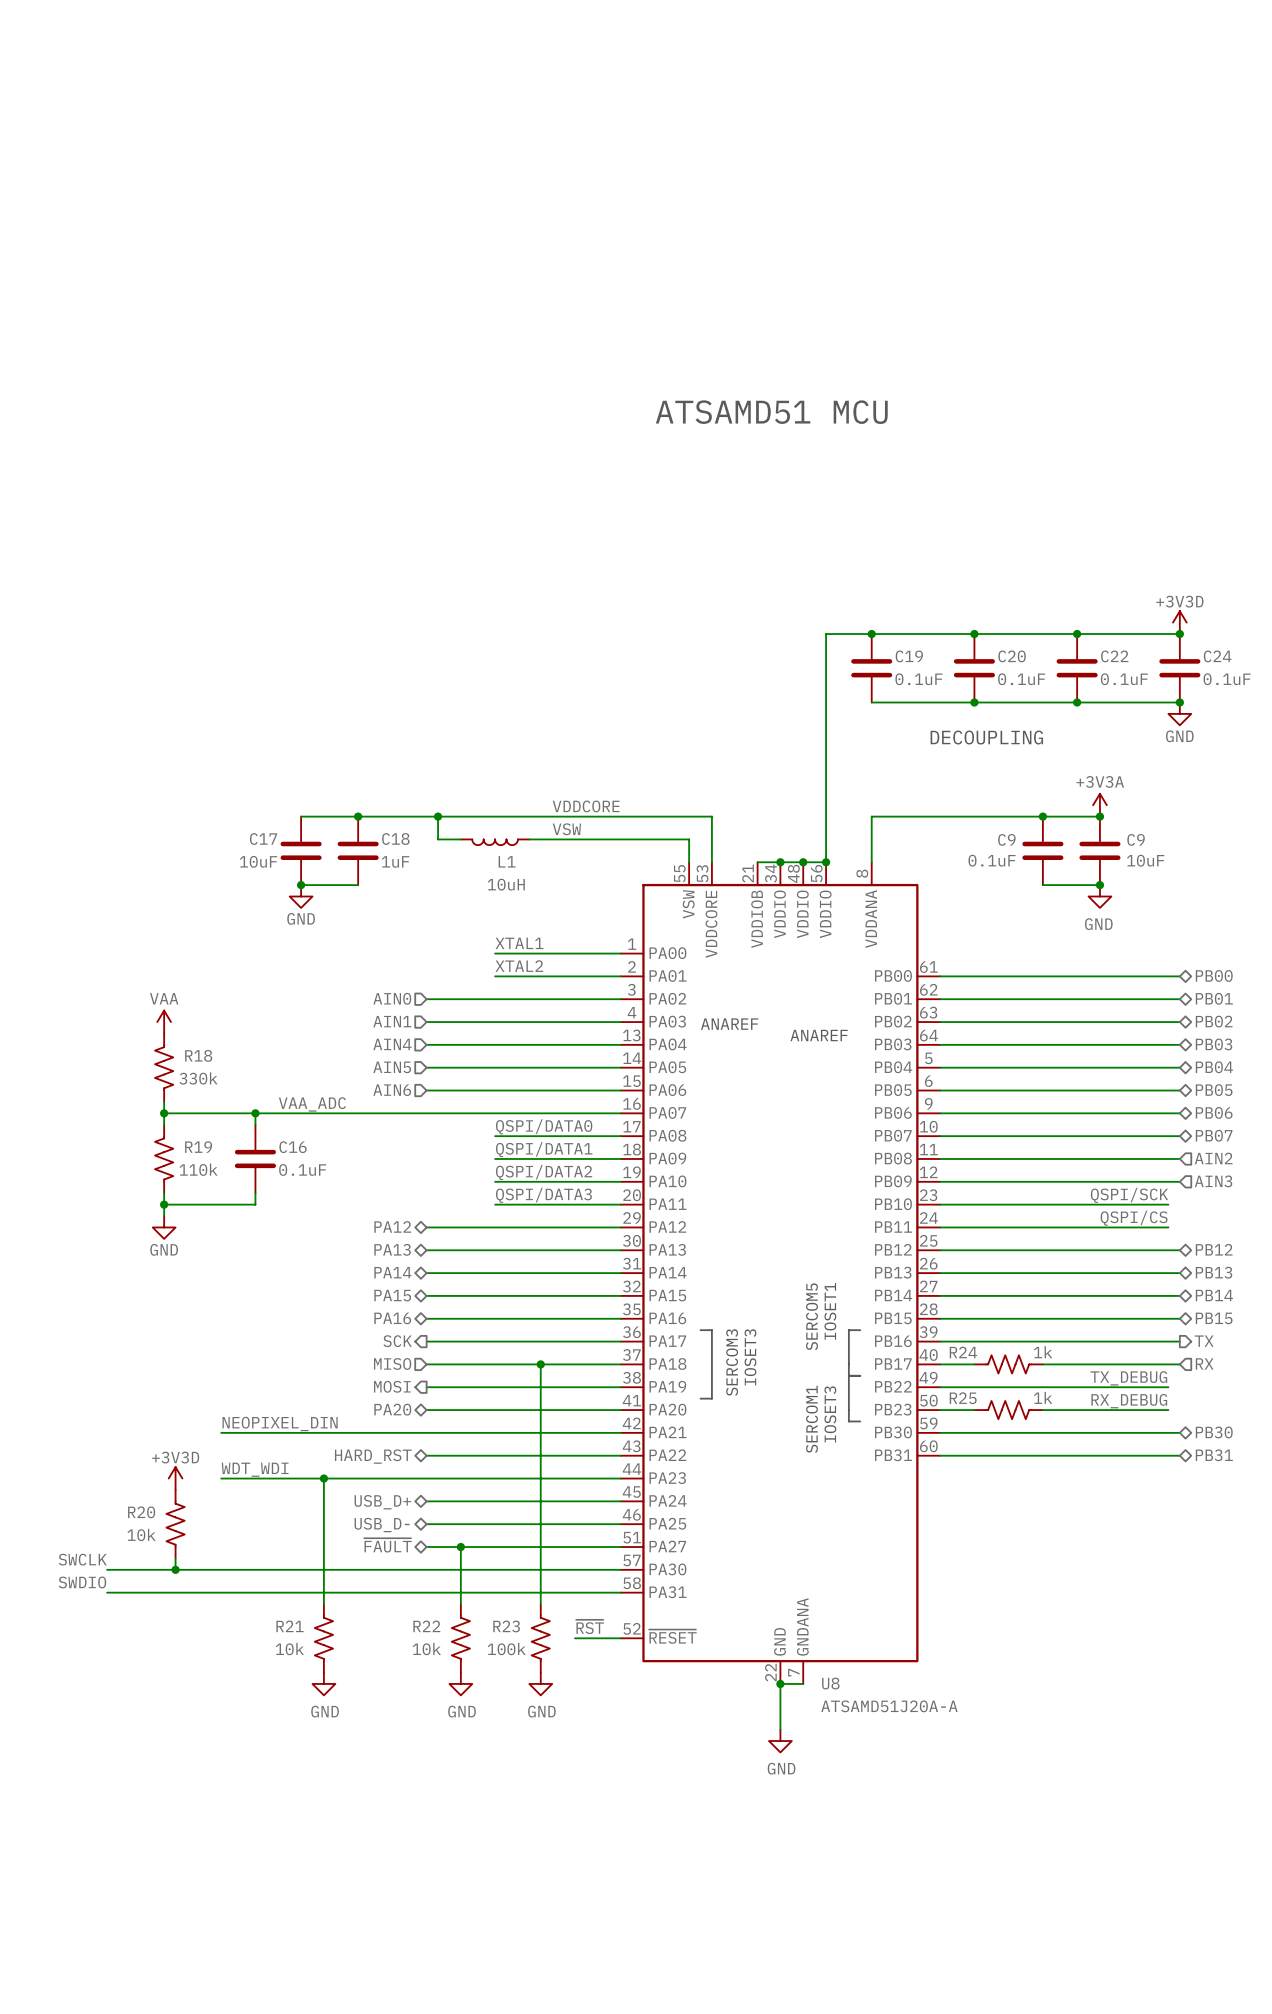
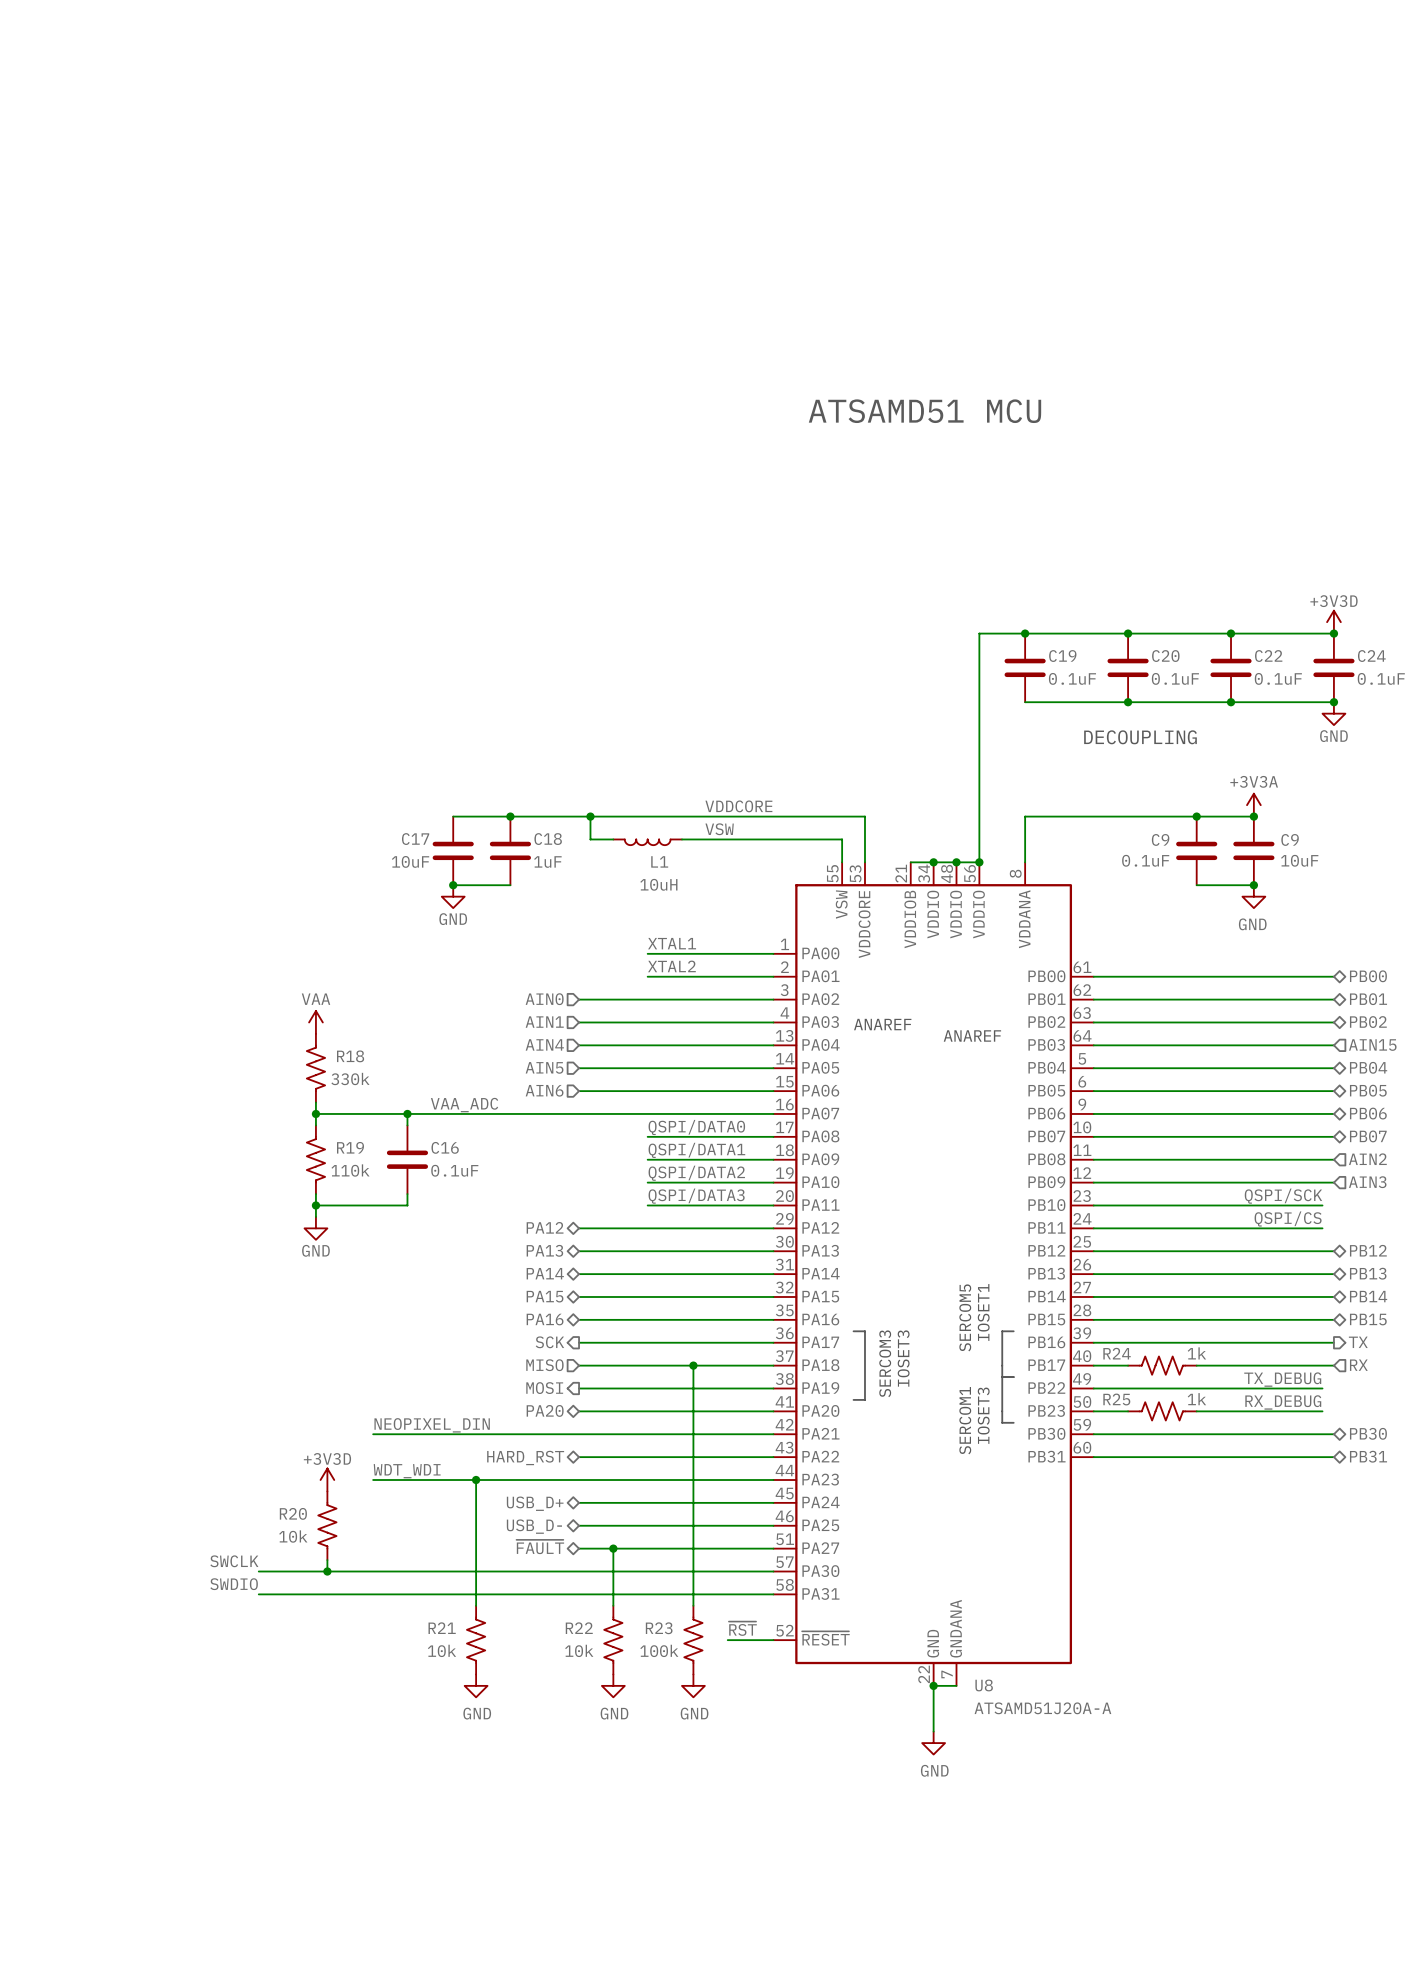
hierarchical label shape: bidirectional (1214, 1044) -> input (1372, 1045)
hierarchical label: PB03 (1214, 1044) -> AIN15 (1372, 1045)

